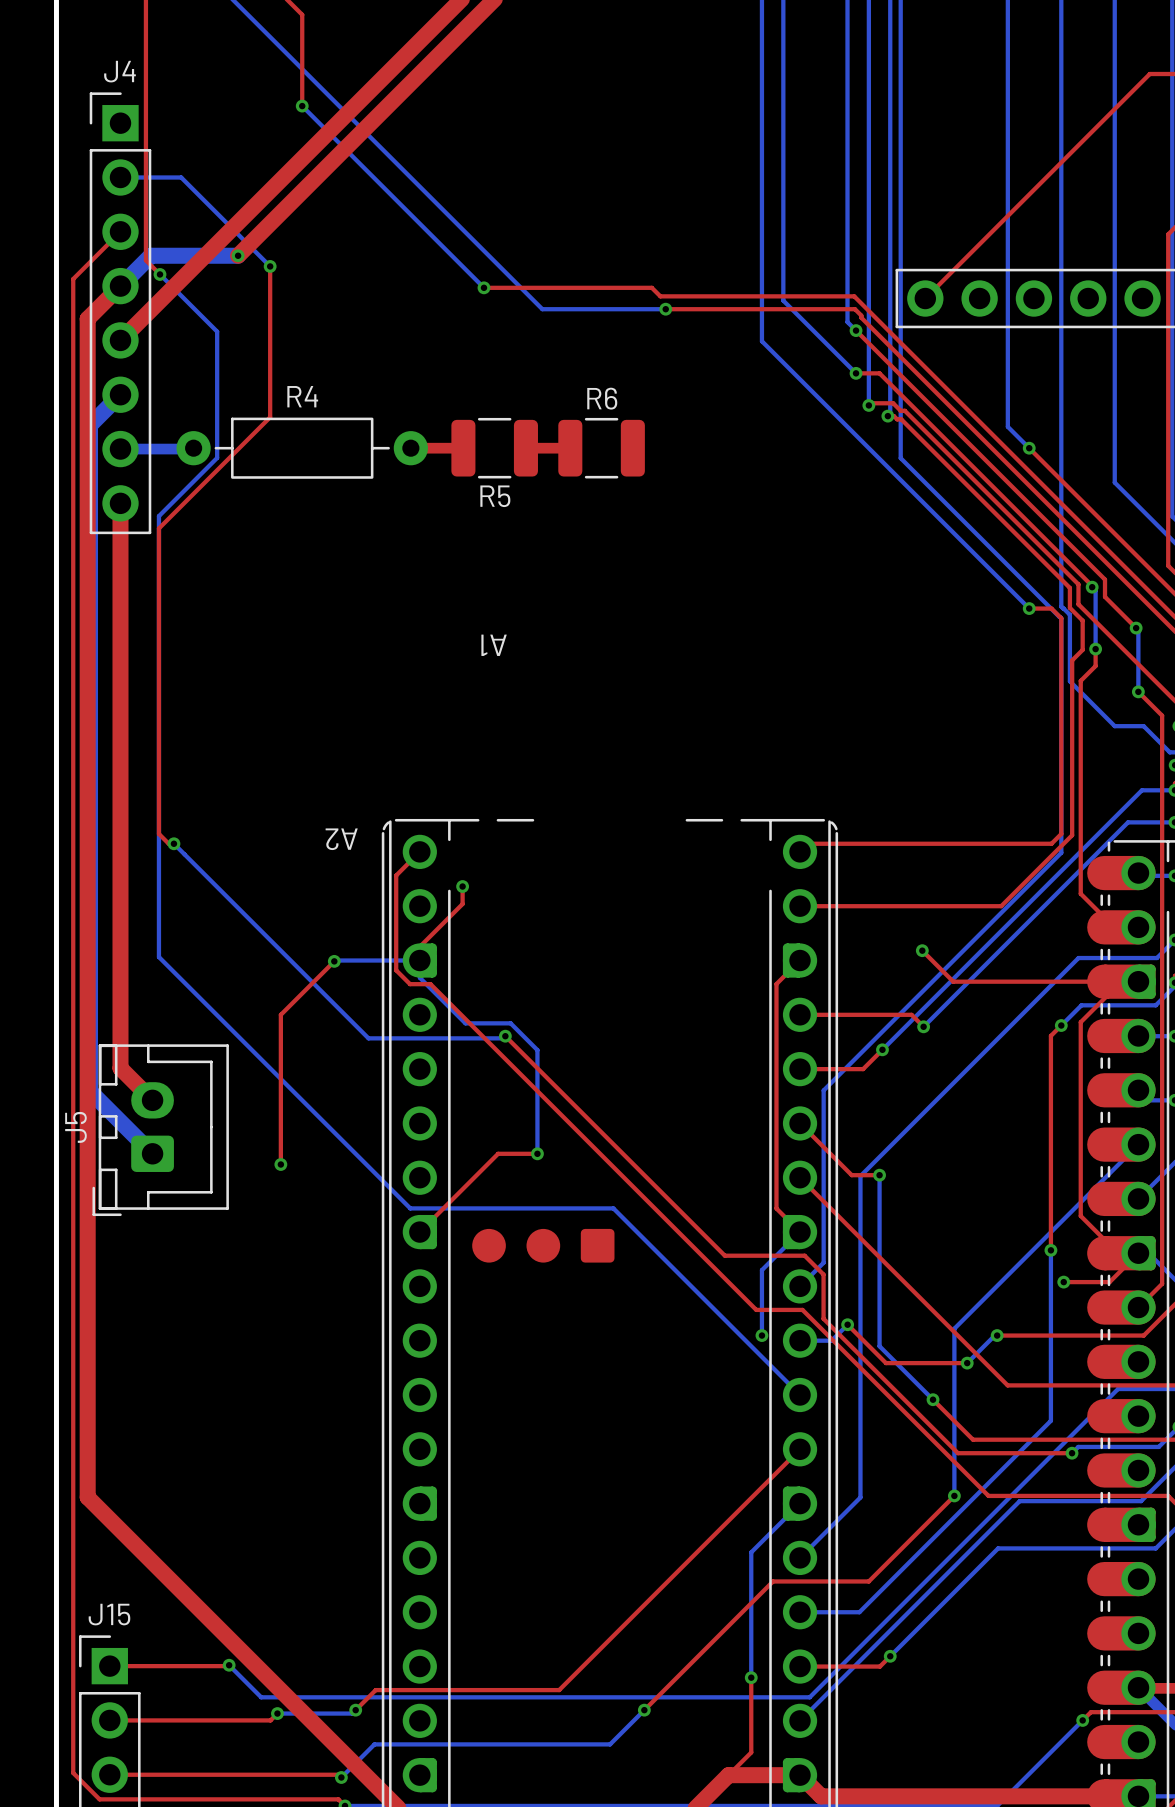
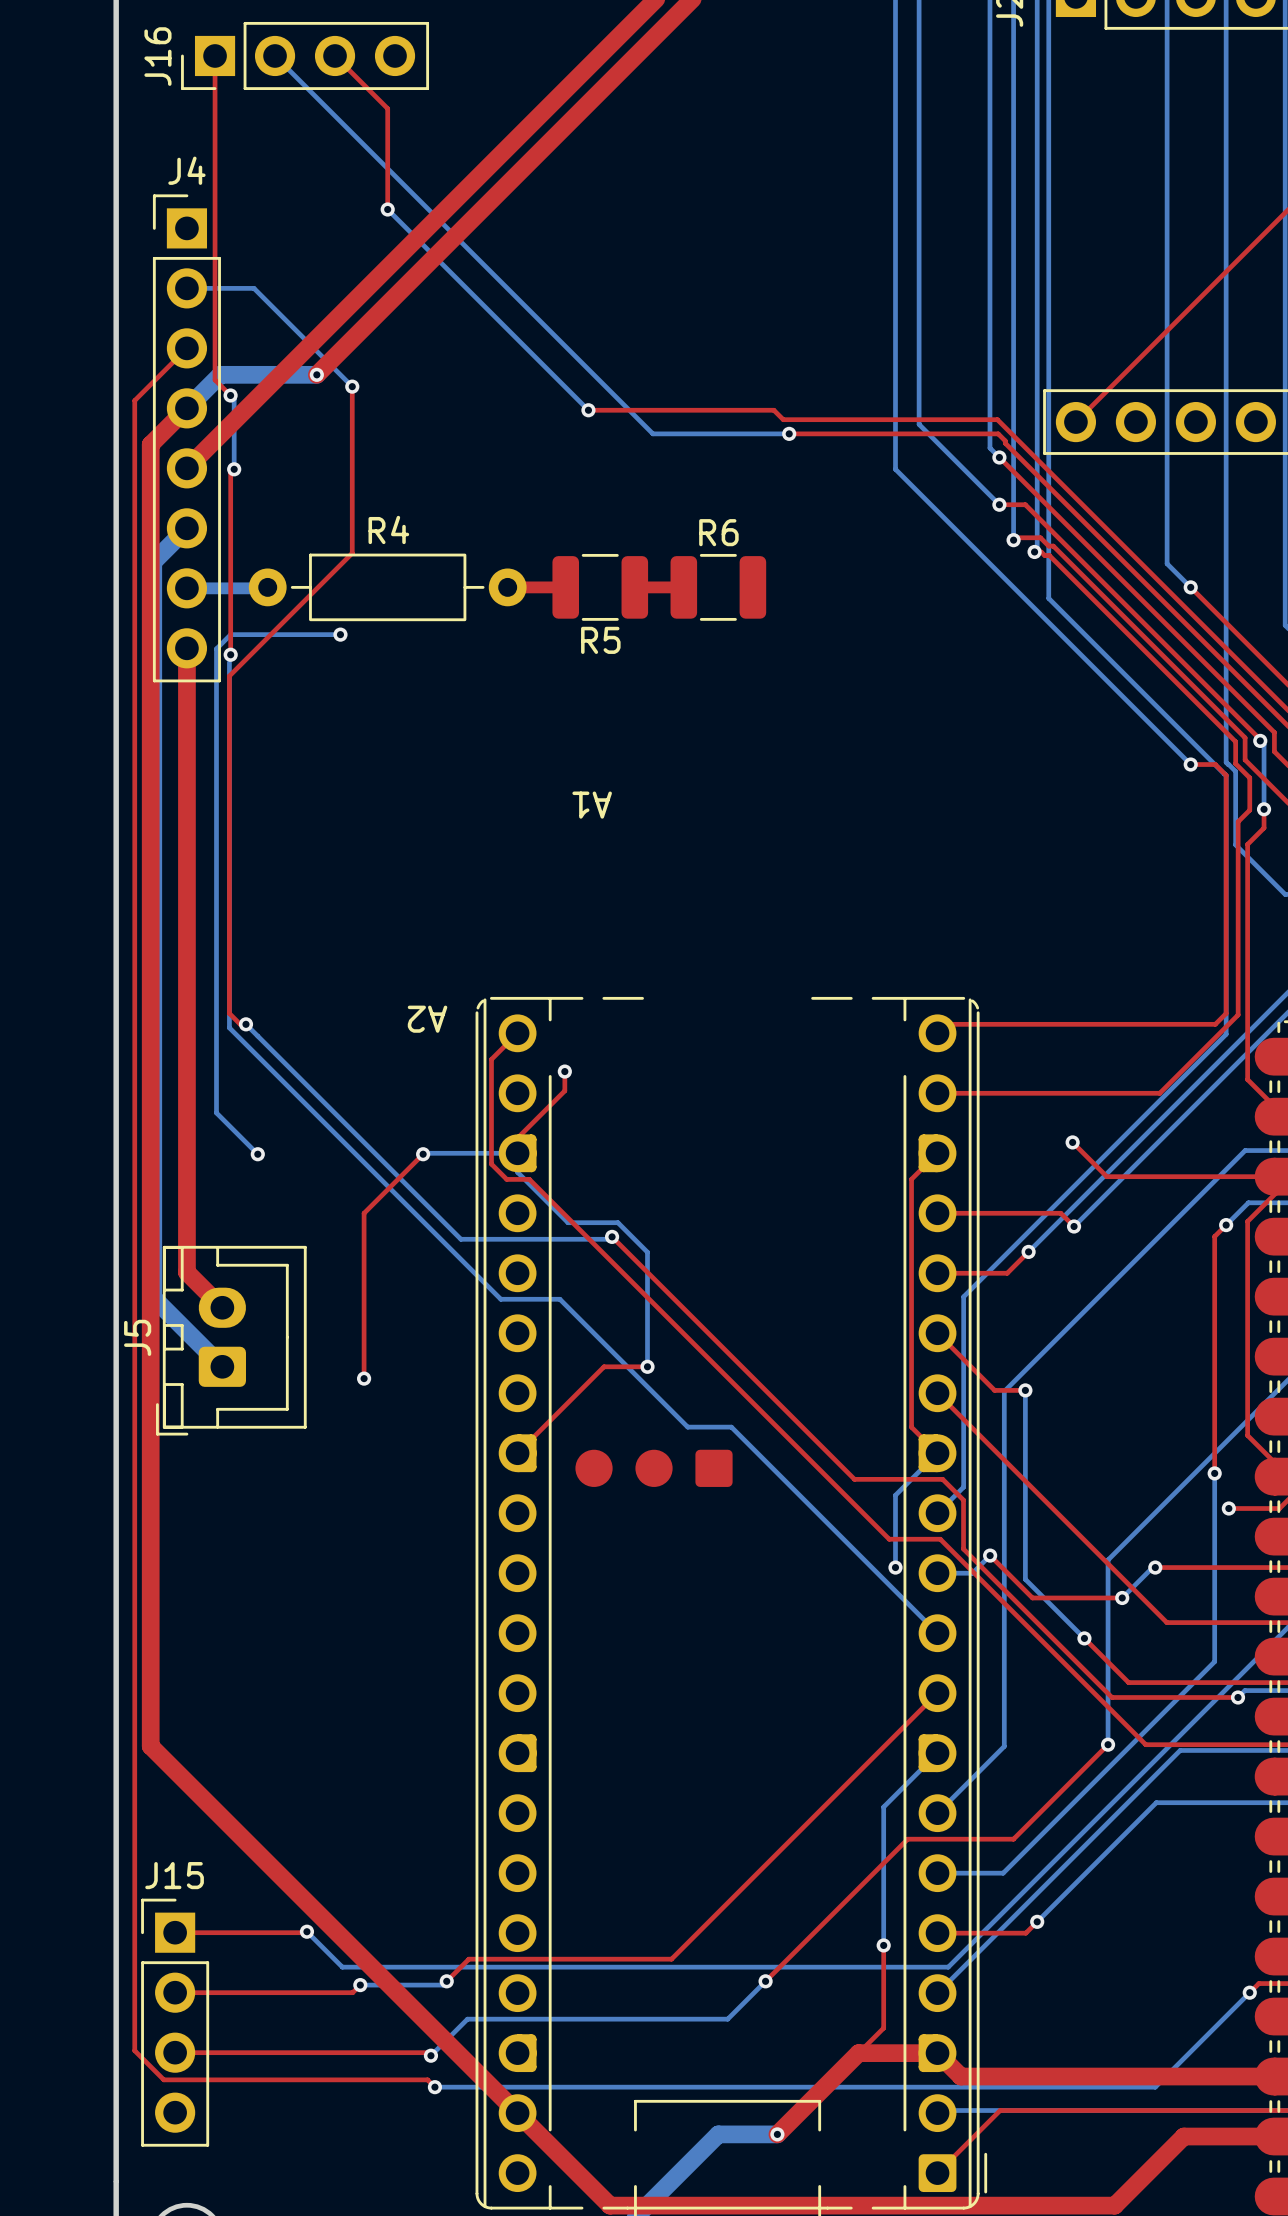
bottom track: (163, 277) (217, 331) (217, 457) (158, 516) -> (234, 399) (234, 469)
top track: none -> (234, 469) (230, 472) (230, 654)
via: none -> (234, 469)
bottom track: none -> (340, 634) (230, 634) (216, 648) (216, 1112) (257, 1154)
via: none -> (340, 634)
via: none -> (230, 654)
bottom track: (158, 846) (158, 957) (410, 1208) (573, 1208) -> (229, 1027) (500, 1299) (559, 1299) (687, 1427)
via: none -> (257, 1154)

